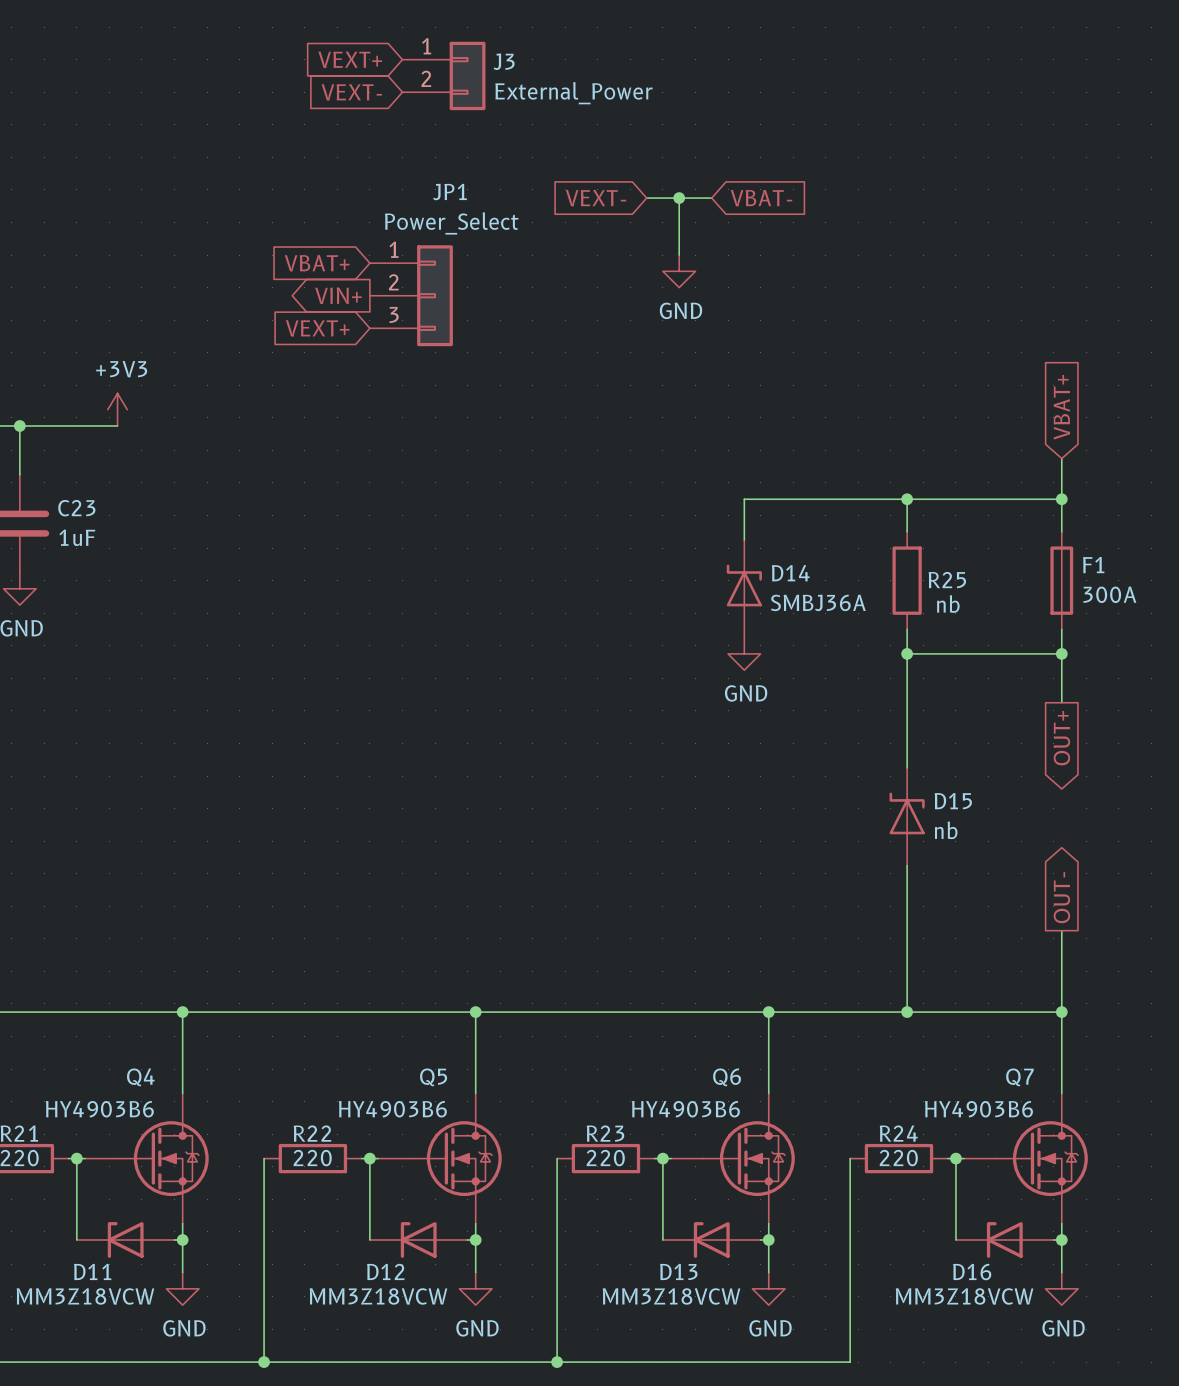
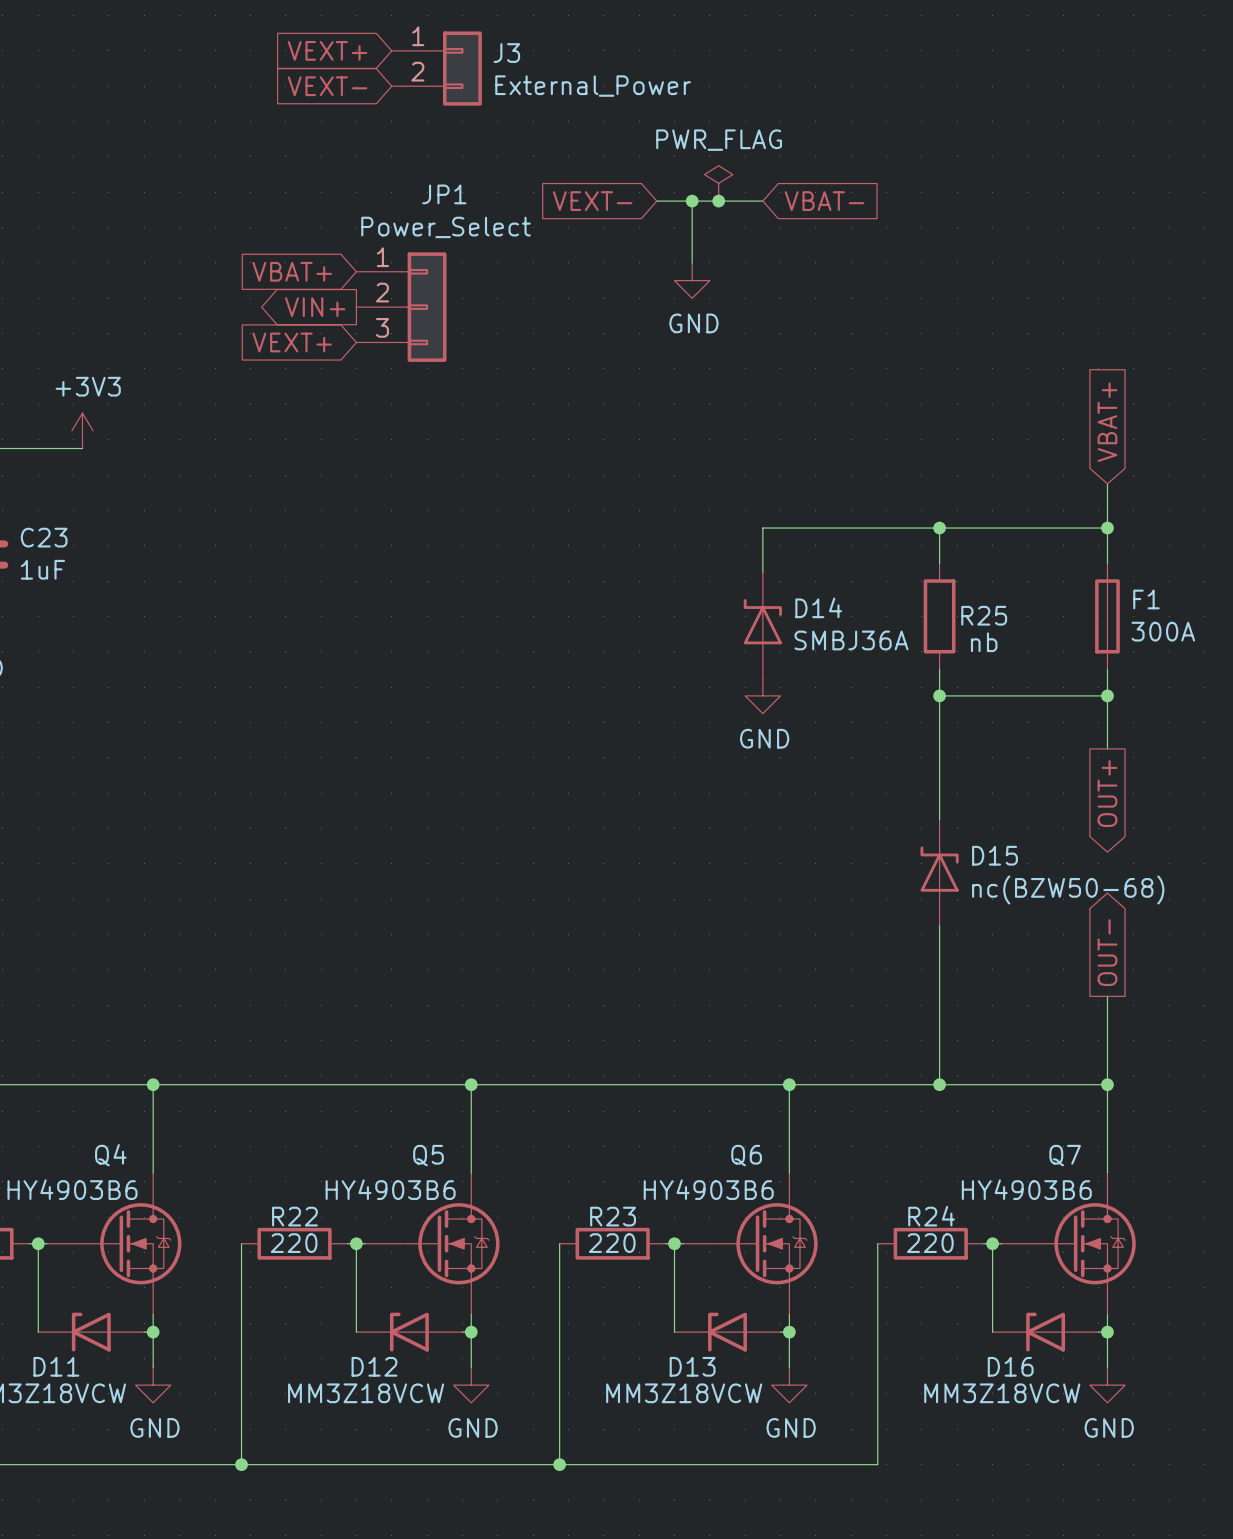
power symbol: none -> PWR_FLAG (718, 183)
junction: none -> (718, 201)
wire: none -> (727, 201) (762, 201)
global label position: VBAT- (761, 198) -> VBAT- (824, 201)
D15 value: nb (946, 830) -> nc(BZW50-68) (1068, 889)

